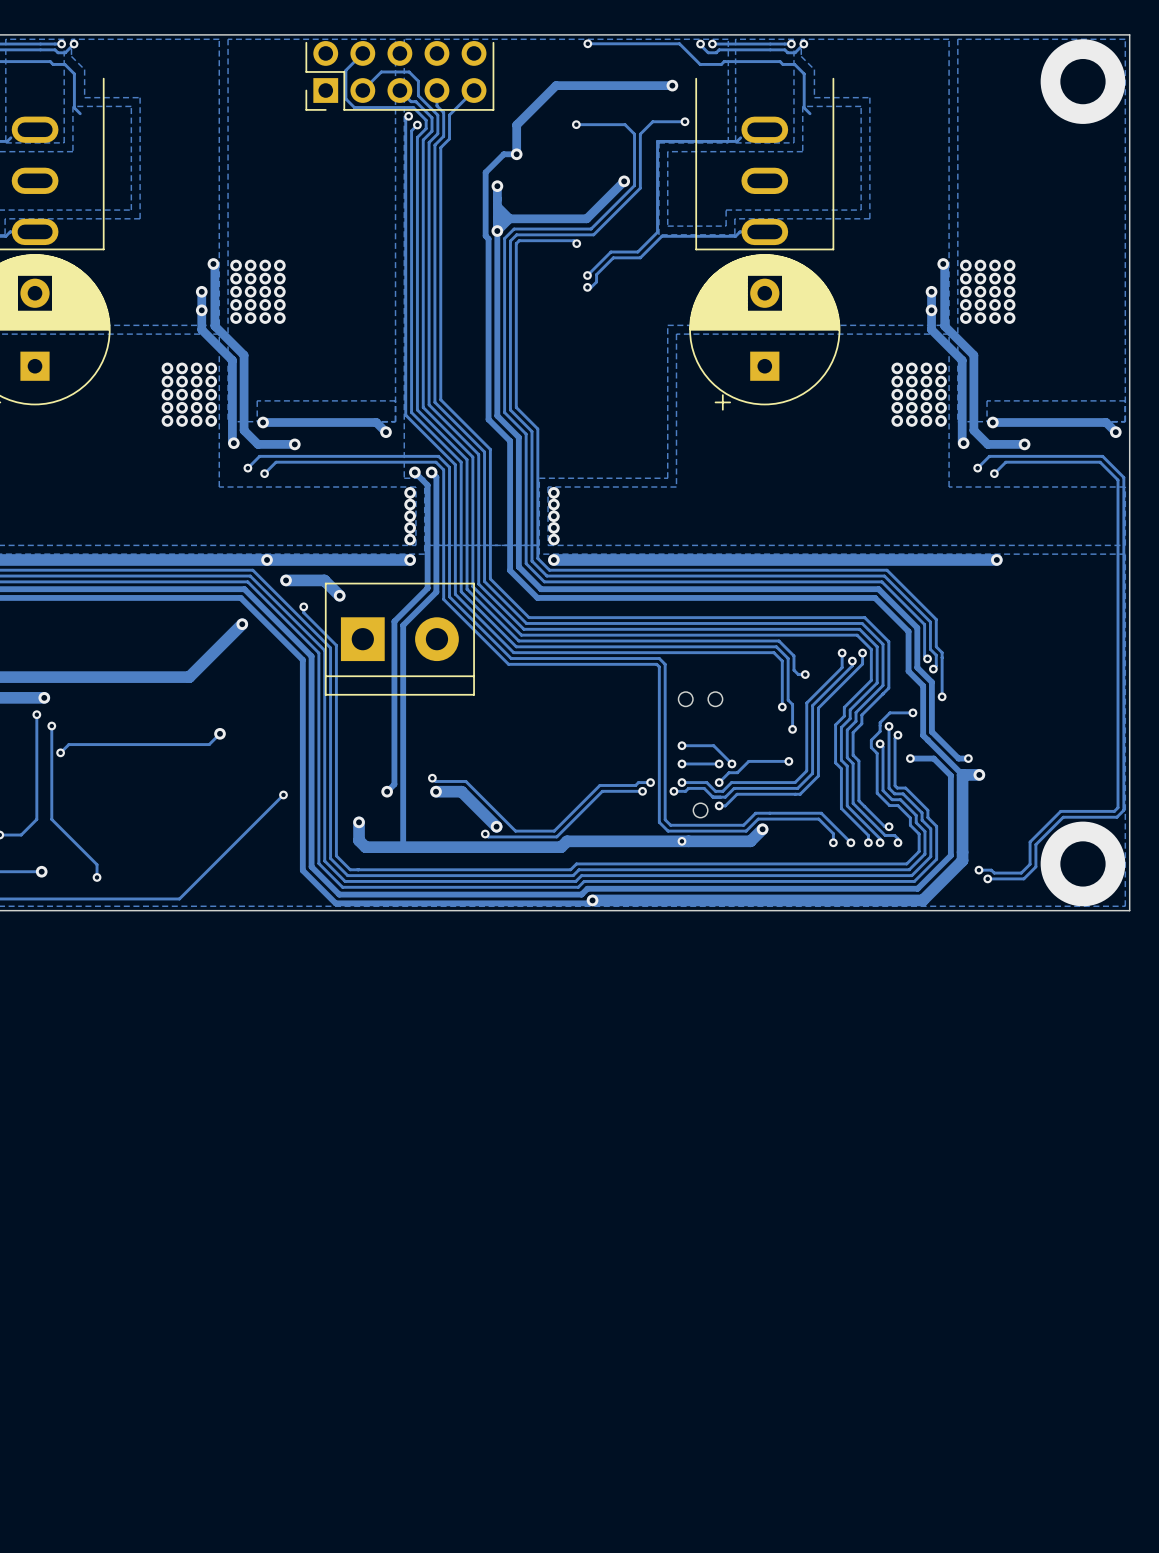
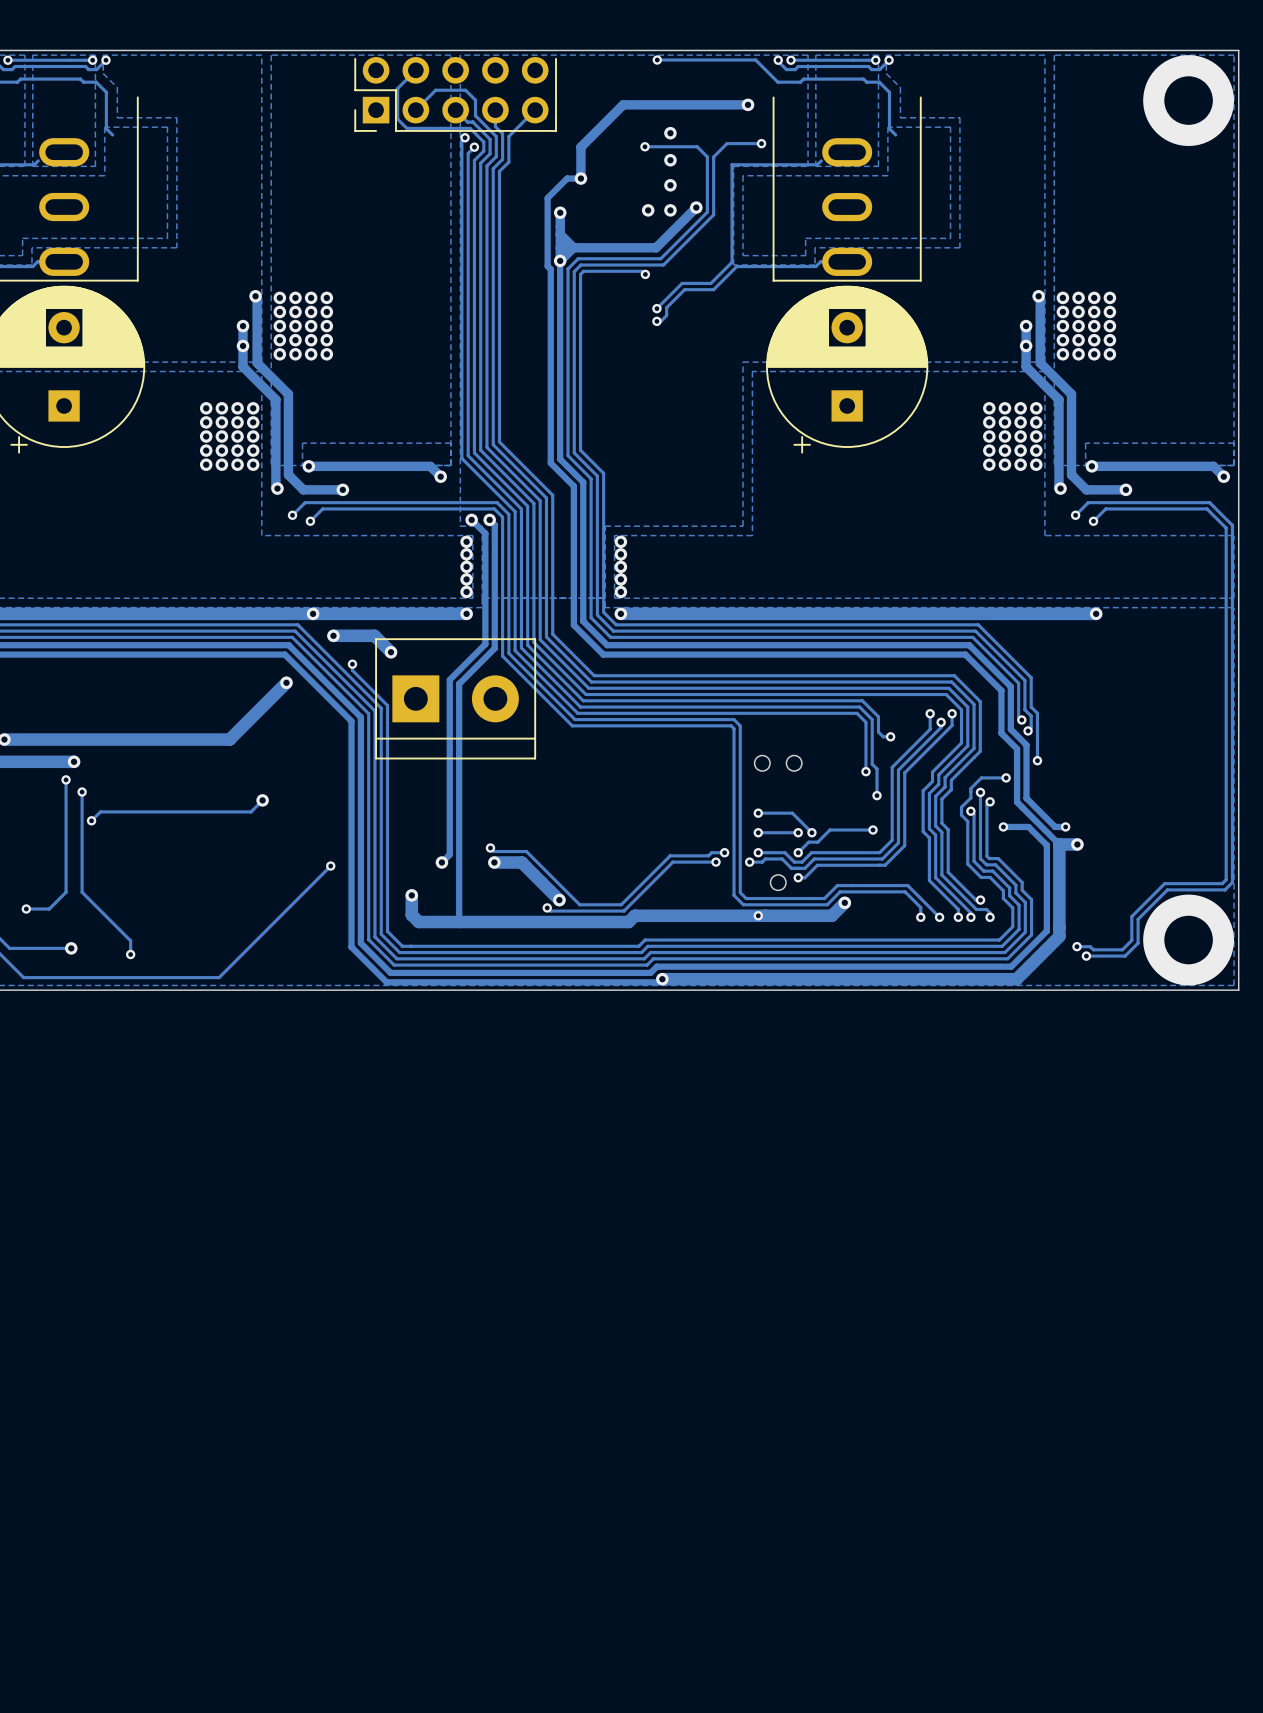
via: none -> (670, 133)
via: none -> (670, 160)
via: none -> (670, 185)
via: none -> (648, 210)
via: none -> (670, 210)

